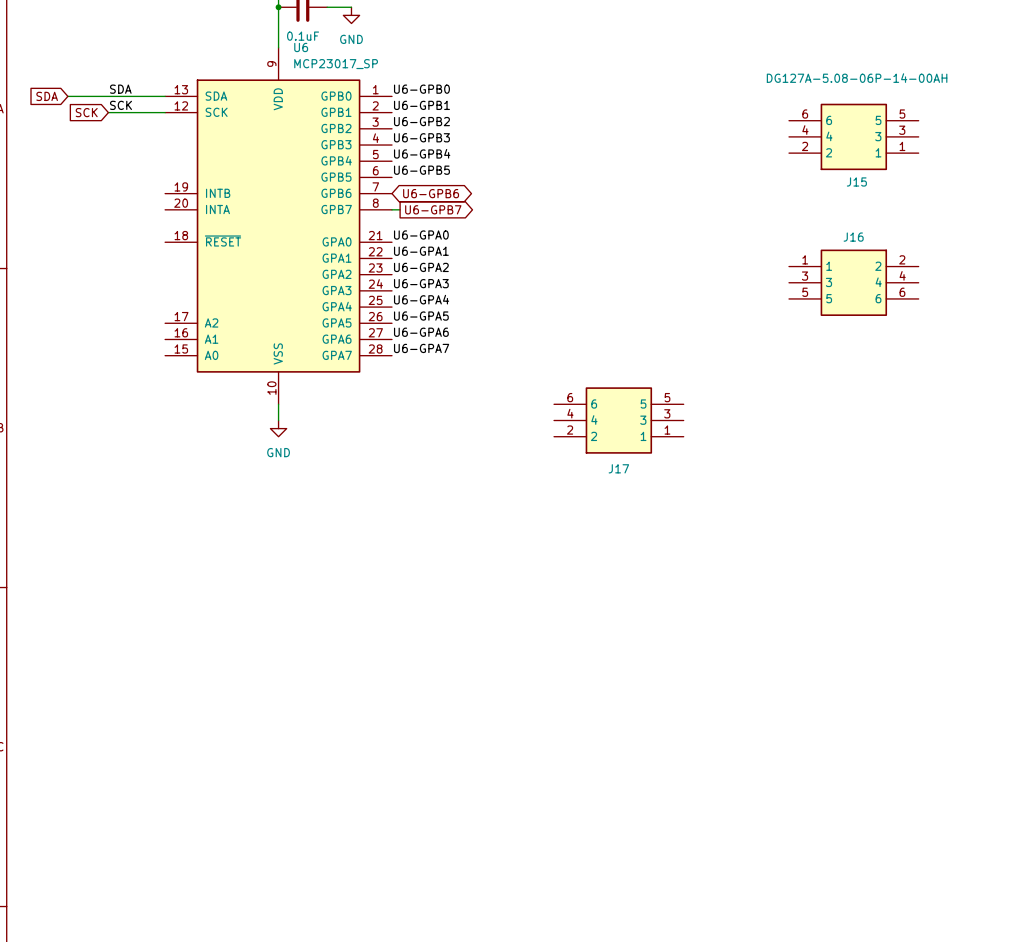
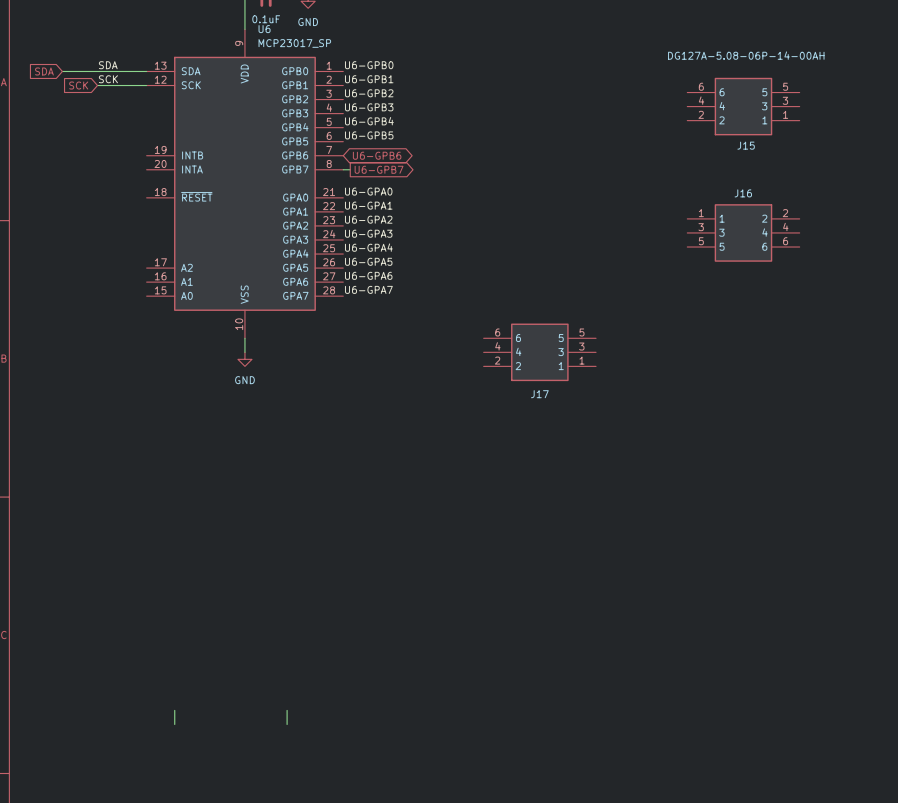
wire: none -> (174, 710) (174, 724)
wire: none -> (287, 710) (287, 724)

